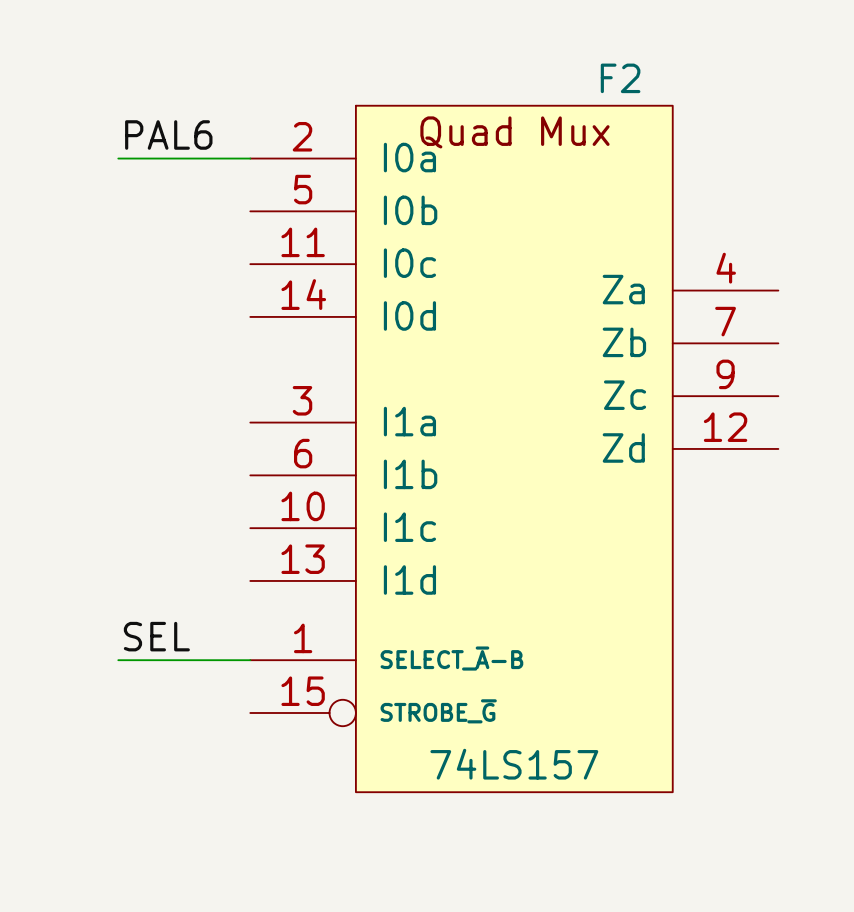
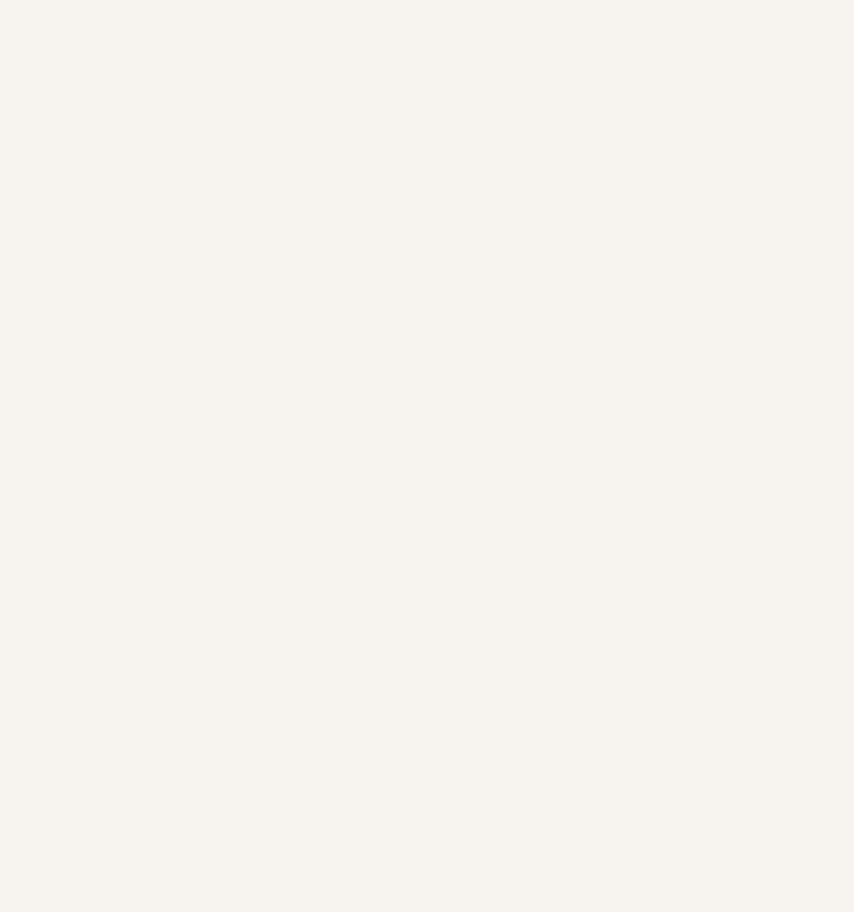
label: PAL6 (168, 134) -> none
wire: (118, 158) (250, 158) -> none
F2: 74LS157 (514, 448) -> none
label: SEL (156, 636) -> none
wire: (118, 660) (250, 660) -> none

